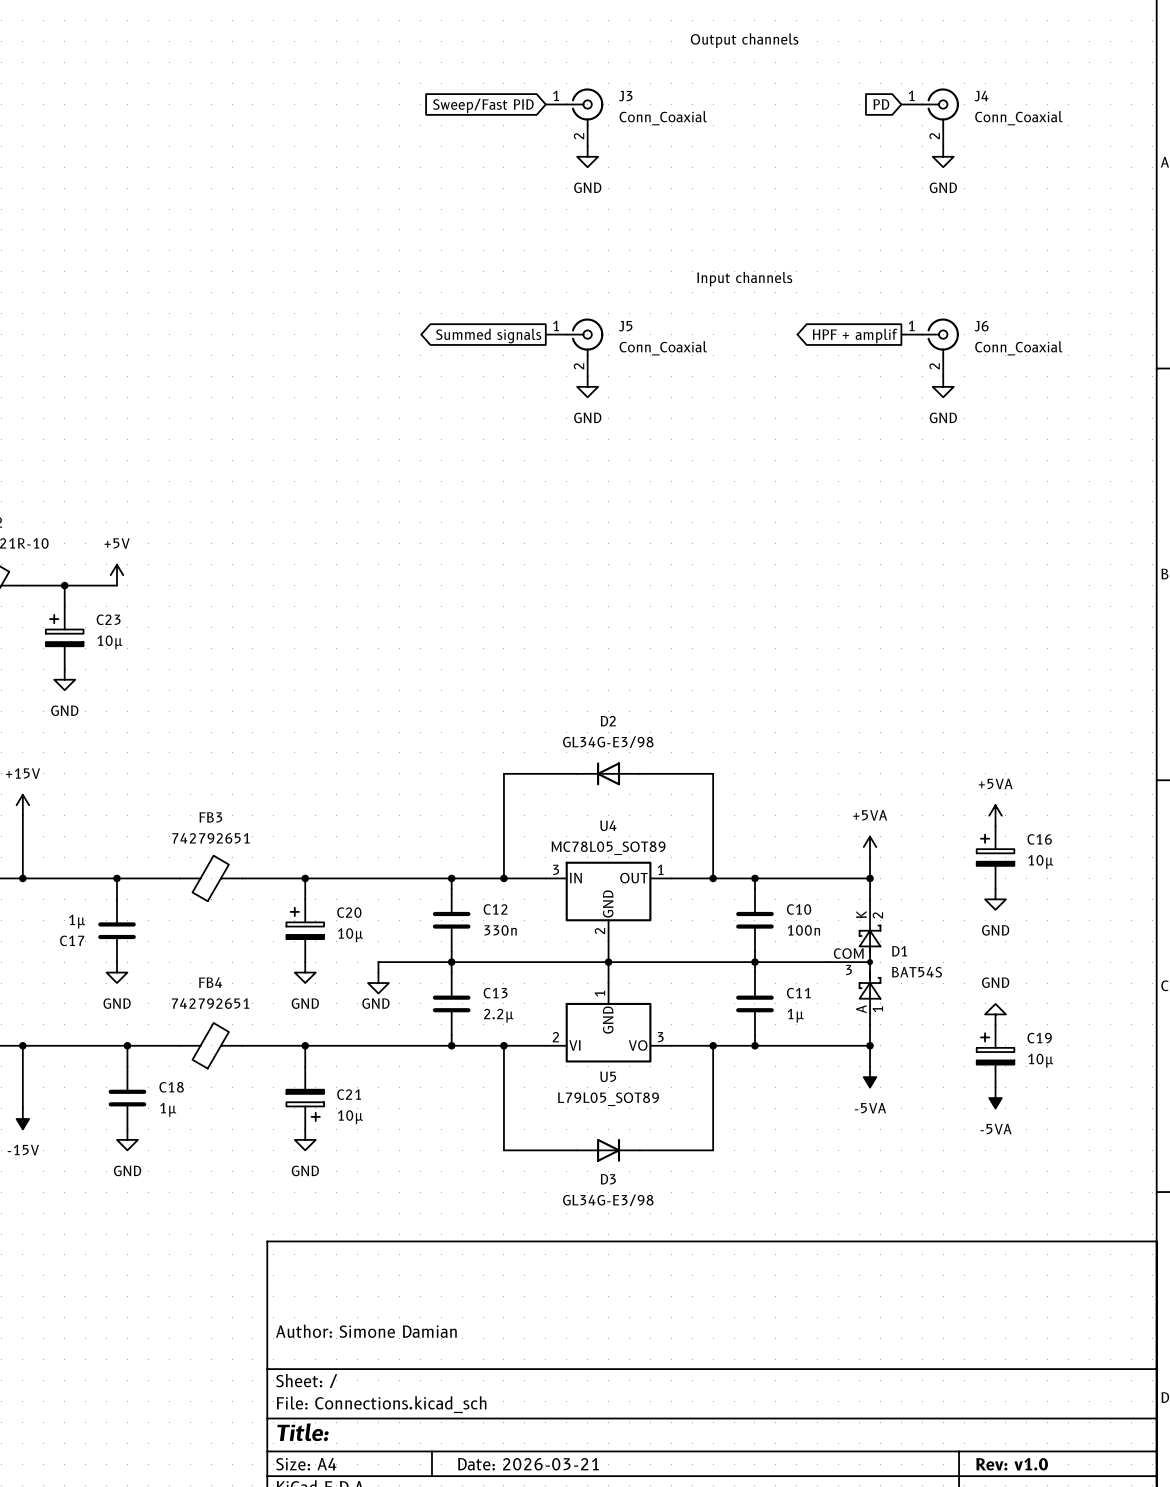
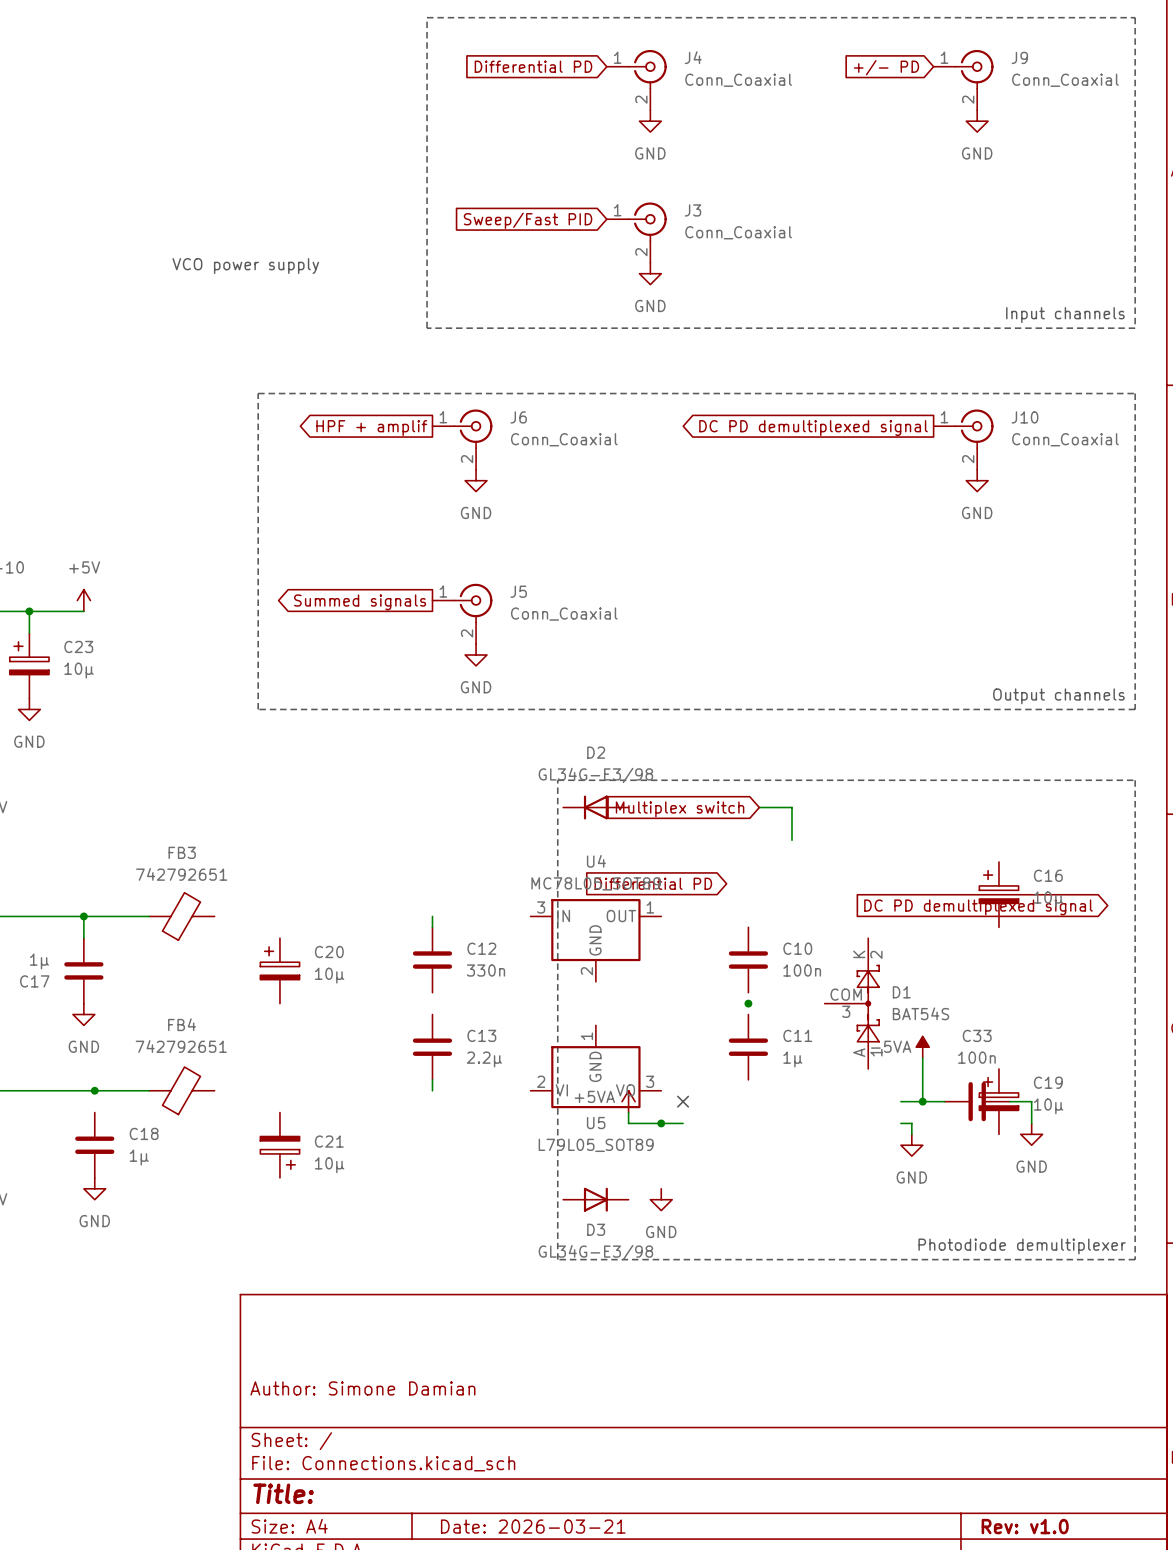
line: none -> (427, 17) (1135, 17) (1135, 328) (427, 328) (427, 17)
text: Output channels (744, 40) -> none
global label: none -> Differential PD (533, 66)
global label: none -> +/- PD (886, 67)
J9: none -> Conn_Coaxial (963, 80)
global label: PD (881, 104) -> none
global label position: Sweep/Fast PID (483, 105) -> Sweep/Fast PID (528, 220)
power symbol: none -> GND (650, 121)
J3 position: (574, 117) -> (636, 232)
J4 position: (930, 117) -> (636, 80)
power symbol: GND (587, 156) -> none
power symbol position: GND (943, 156) -> GND (977, 121)
text: none -> VCO power supply (245, 266)
power symbol: none -> GND (650, 273)
text: Input channels (744, 279) -> none
text: none -> Input channels (1065, 315)
global label: HPF + amplif (855, 335) -> none
global label: Summed signals (488, 336) -> none
J5 position: (574, 347) -> (462, 613)
J6 position: (930, 347) -> (462, 439)
line: none -> (258, 393) (1135, 393) (1135, 709) (258, 709) (258, 393)
power symbol: GND (587, 386) -> none
power symbol position: GND (943, 386) -> GND (977, 480)
global label: none -> HPF + amplif (371, 428)
global label: none -> DC PD demultiplexed signal (813, 428)
J10: none -> Conn_Coaxial (963, 439)
power symbol: none -> GND (476, 480)
global label: none -> Summed signals (360, 602)
power symbol: none -> GND (476, 655)
text: none -> Output channels (1058, 696)
line: none -> (557, 780) (1135, 780) (1135, 1259) (557, 1259) (557, 780)
wire: (577, 773) (503, 773) (503, 878) -> none
wire: (639, 773) (713, 773) (713, 878) -> none
wire: none -> (759, 807) (791, 807) (791, 840)
global label: none -> Multiplex switch (680, 809)
power symbol: +5VA (995, 815) -> none
global label: none -> Differential PD (653, 883)
power symbol: +5VA (870, 847) -> none
wire: (870, 857) (870, 899) -> none
global label: none -> DC PD demultiplexed signal (978, 907)
wire: (242, 878) (545, 878) -> none
wire: (305, 878) (305, 899) -> none
junction: (305, 878) -> none
junction: (451, 878) -> none
junction: (503, 878) -> none
wire: (671, 878) (870, 878) -> none
junction: (713, 878) -> none
wire: (754, 878) (754, 888) -> none
junction: (754, 878) -> none
junction: (870, 878) -> none
power symbol: GND (995, 899) -> none
wire: (608, 941) (608, 983) -> none
wire: (451, 951) (451, 972) -> none
wire: (754, 951) (754, 972) -> none
junction: (451, 962) -> none
junction: (608, 962) -> none
wire: (828, 962) (378, 962) (378, 972) -> none
power symbol: GND (305, 972) -> none
power symbol: GND (378, 983) -> none
power symbol: none -> -5VA (922, 1047)
power symbol: GND (995, 1014) -> none
wire: (870, 1024) (870, 1066) -> (922, 1058) (922, 1101)
wire: (754, 1035) (754, 1045) -> none
wire: (127, 1045) (127, 1066) -> none
wire: (242, 1045) (545, 1045) -> none
wire: (305, 1045) (305, 1066) -> none
junction: (305, 1045) -> none
junction: (451, 1045) -> none
wire: (503, 1045) (503, 1150) (577, 1150) -> none
junction: (503, 1045) -> none
wire: (671, 1045) (870, 1045) -> none
wire: (713, 1045) (713, 1150) (639, 1150) -> none
junction: (713, 1045) -> none
junction: (754, 1045) -> none
junction: (870, 1045) -> none
power symbol: none -> +5VA (628, 1101)
no-connect mark: none -> (683, 1101)
wire: none -> (900, 1101) (944, 1101)
junction: none -> (922, 1101)
C33: none -> 100n (977, 1101)
wire: none -> (1009, 1101) (1031, 1101) (1031, 1123)
wire: none -> (628, 1112) (628, 1123) (683, 1123)
junction: none -> (661, 1123)
power symbol: -5VA (870, 1077) -> none
wire: none -> (900, 1123) (911, 1123) (911, 1134)
power symbol: none -> GND (1031, 1134)
power symbol: none -> GND (911, 1145)
power symbol: -5VA (995, 1098) -> none
power symbol: GND (305, 1139) -> none
power symbol: none -> GND (661, 1199)
text: none -> Photodiode demultiplexer (1022, 1246)

